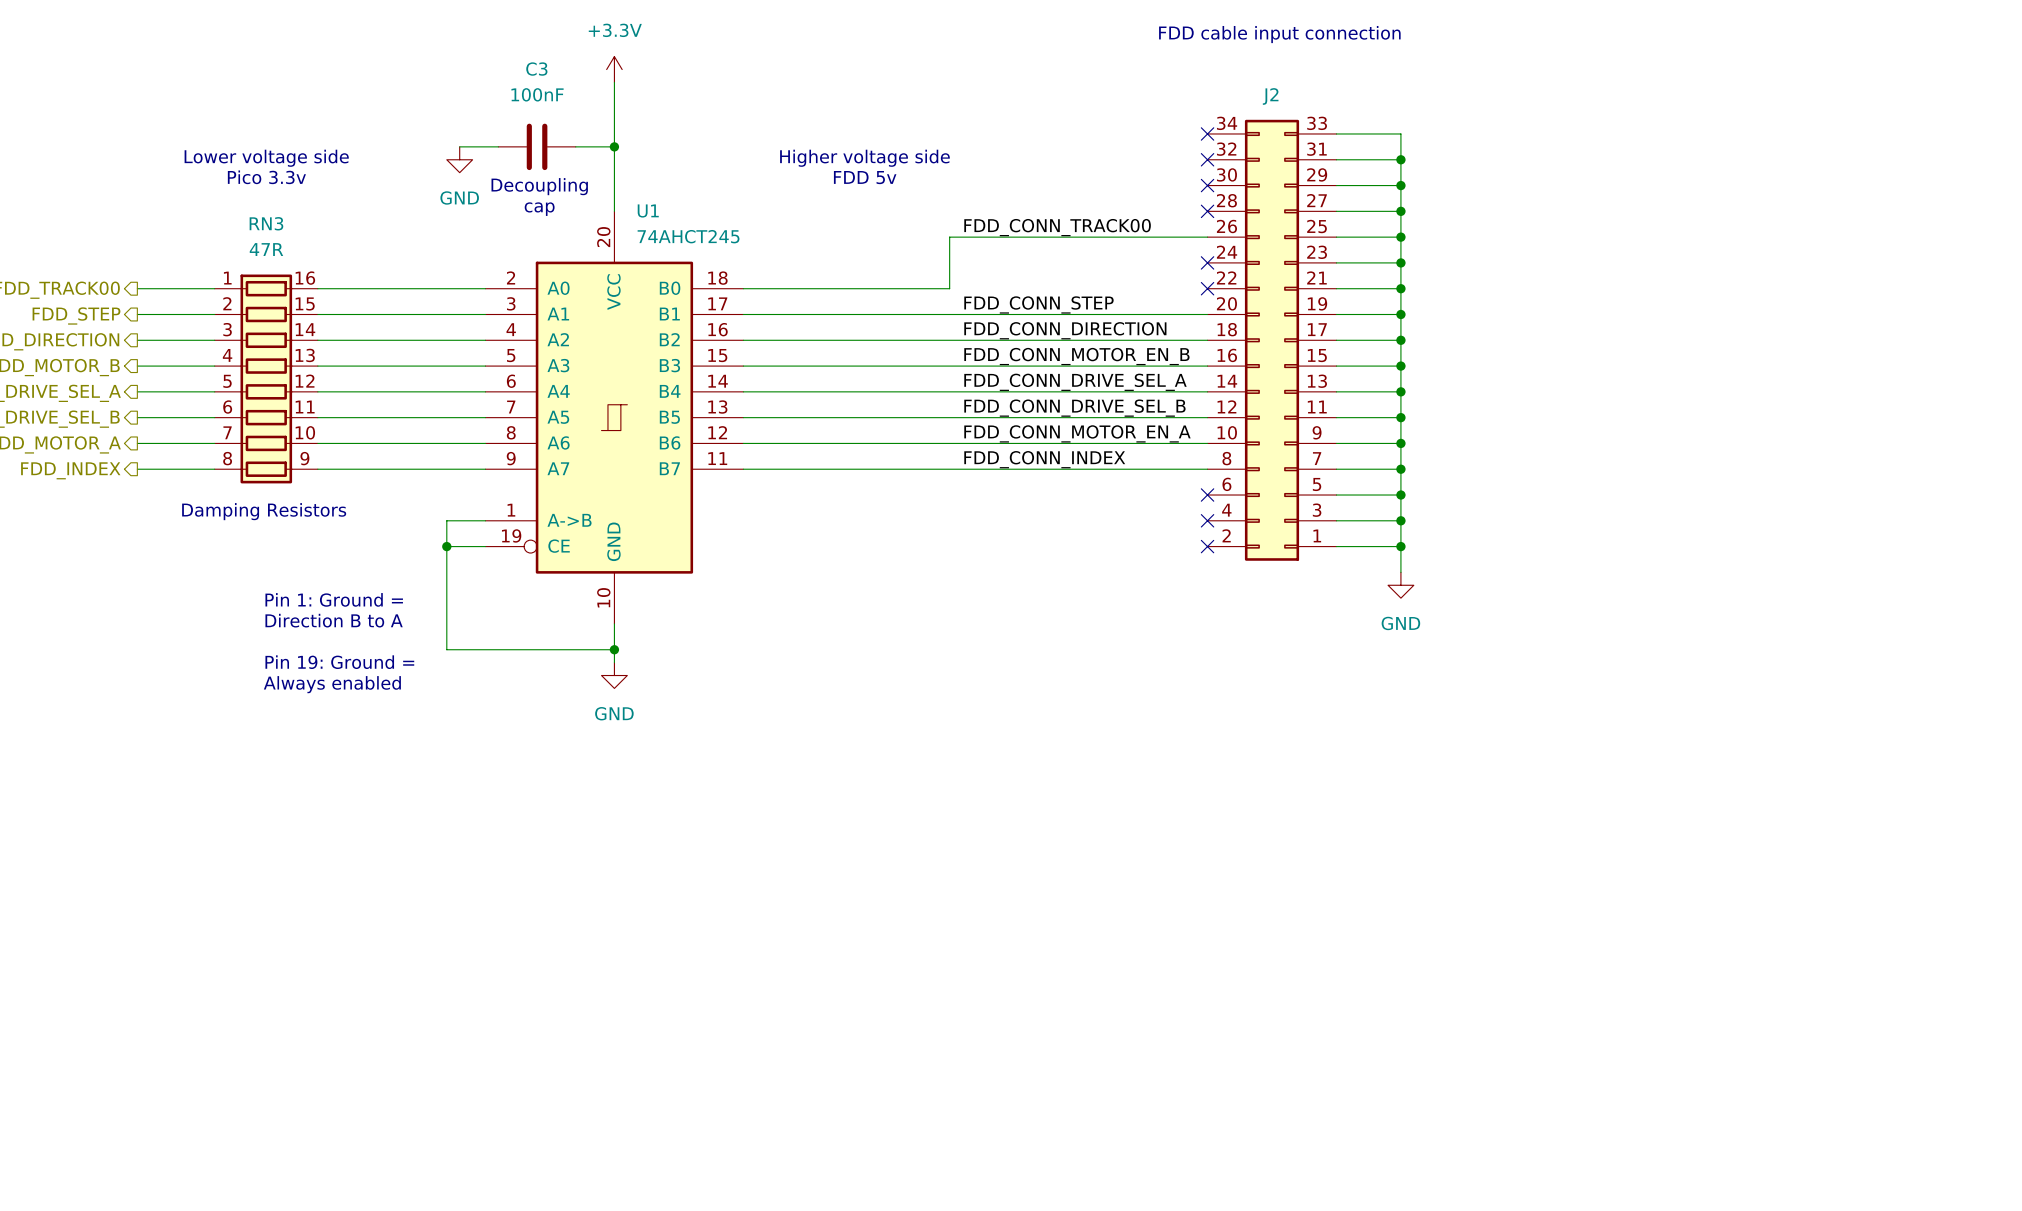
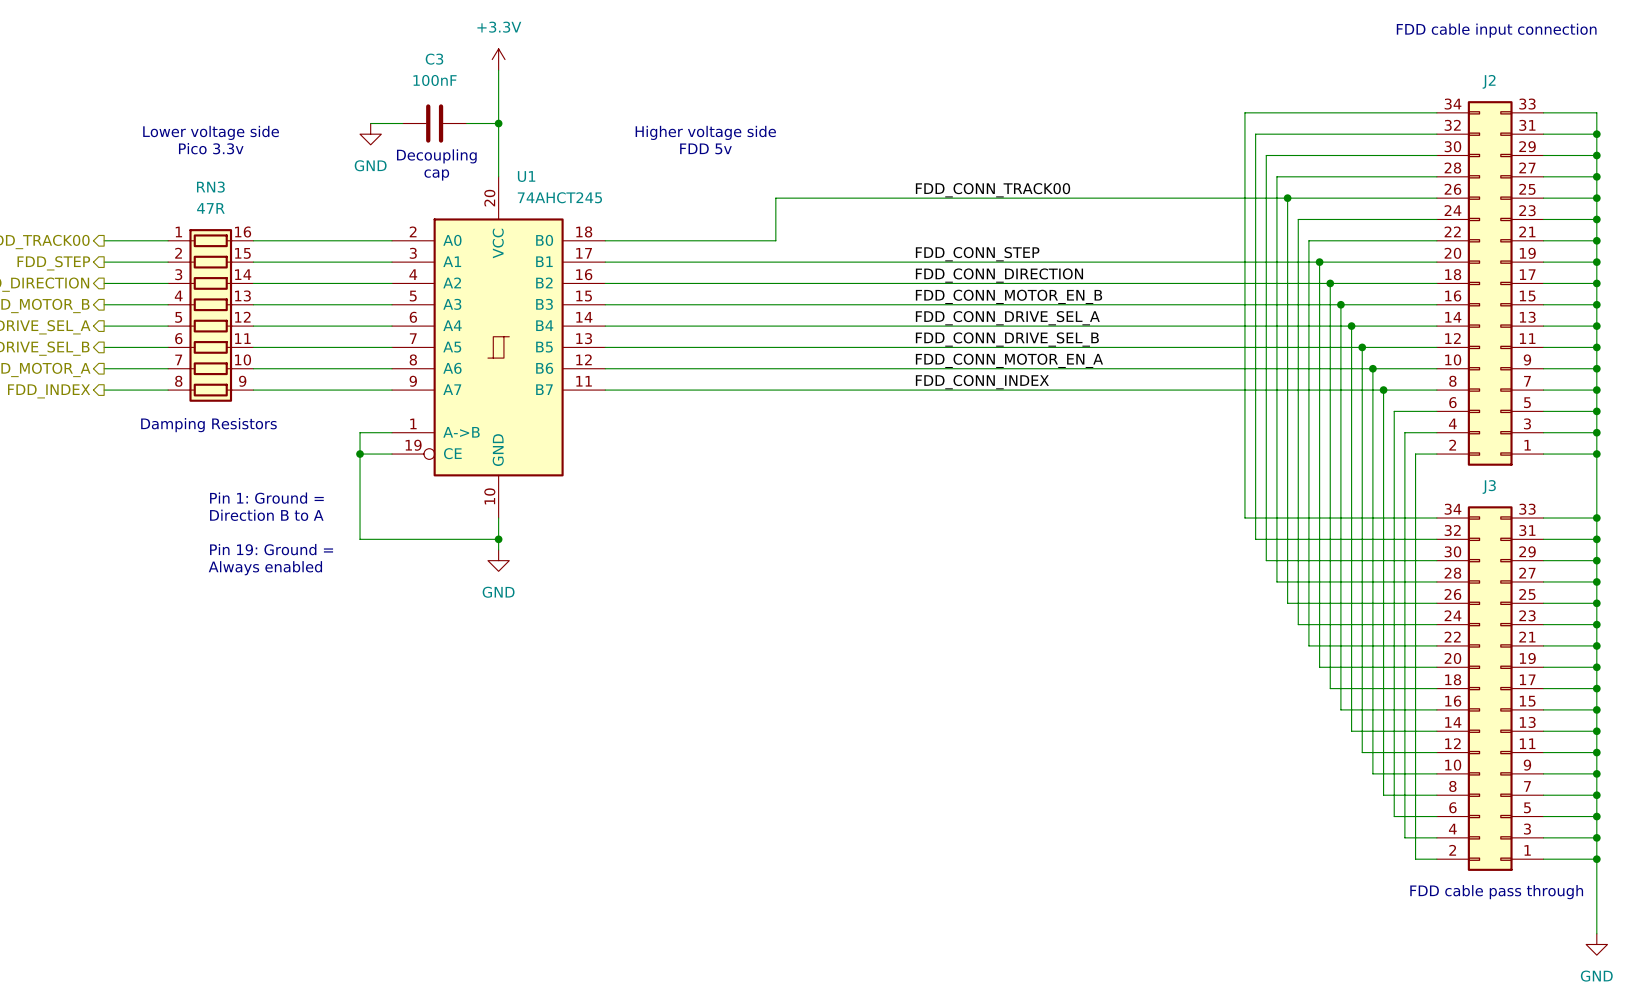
text: FDD cable input connection (1279, 34) -> none
text: none -> FDD cable input connection (1496, 30)
no-connect mark: (1207, 133) -> none
wire: (1336, 133) (1400, 133) (1400, 572) -> none
wire: none -> (1436, 112) (1244, 112) (1244, 518) (1436, 518)
wire: none -> (1543, 112) (1596, 112) (1596, 933)
no-connect mark: (1207, 159) -> none
wire: (1336, 159) (1400, 159) -> none
junction: (1400, 159) -> none
wire: none -> (1436, 134) (1255, 134) (1255, 539) (1436, 539)
wire: none -> (1543, 134) (1596, 134)
junction: none -> (1596, 134)
no-connect mark: (1207, 185) -> none
wire: (1336, 185) (1400, 185) -> none
junction: (1400, 185) -> none
wire: none -> (1436, 155) (1266, 155) (1266, 560) (1436, 560)
wire: none -> (1543, 155) (1596, 155)
junction: none -> (1596, 155)
no-connect mark: (1207, 211) -> none
wire: (1336, 211) (1400, 211) -> none
junction: (1400, 211) -> none
wire: none -> (1436, 176) (1276, 176) (1276, 581) (1436, 581)
wire: none -> (1543, 176) (1596, 176)
junction: none -> (1596, 176)
label position: FDD_CONN_TRACK00 (1057, 227) -> FDD_CONN_TRACK00 (993, 190)
wire: none -> (1149, 198) (1436, 198)
junction: (1400, 237) -> none
wire: none -> (1287, 198) (1287, 603) (1436, 603)
junction: none -> (1287, 198)
wire: none -> (1543, 198) (1596, 198)
junction: none -> (1596, 198)
no-connect mark: (1207, 262) -> none
wire: (1336, 262) (1400, 262) -> none
junction: (1400, 262) -> none
wire: none -> (1436, 219) (1298, 219) (1298, 624) (1436, 624)
wire: none -> (1543, 219) (1596, 219)
junction: none -> (1596, 219)
no-connect mark: (1207, 288) -> none
wire: (1336, 288) (1400, 288) -> none
junction: (1400, 288) -> none
wire: none -> (1436, 240) (1308, 240) (1308, 645) (1436, 645)
wire: none -> (1543, 240) (1596, 240)
junction: none -> (1596, 240)
label position: FDD_CONN_STEP (1038, 304) -> FDD_CONN_STEP (977, 254)
wire: none -> (1149, 262) (1436, 262)
junction: (1400, 314) -> none
wire: none -> (1319, 262) (1319, 667) (1436, 667)
junction: none -> (1319, 262)
wire: none -> (1543, 262) (1596, 262)
junction: none -> (1596, 262)
label position: FDD_CONN_DIRECTION (1065, 330) -> FDD_CONN_DIRECTION (999, 275)
J2 position: (1272, 340) -> (1490, 283)
wire: none -> (1149, 283) (1436, 283)
junction: (1400, 340) -> none
wire: none -> (1330, 283) (1330, 688) (1436, 688)
junction: none -> (1330, 283)
wire: none -> (1543, 283) (1596, 283)
junction: none -> (1596, 283)
label position: FDD_CONN_MOTOR_EN_B (1076, 356) -> FDD_CONN_MOTOR_EN_B (1009, 296)
wire: none -> (1149, 304) (1436, 304)
junction: (1400, 366) -> none
wire: none -> (1340, 304) (1340, 709) (1436, 709)
junction: none -> (1340, 304)
wire: none -> (1543, 304) (1596, 304)
junction: none -> (1596, 304)
label position: FDD_CONN_DRIVE_SEL_A (1075, 382) -> FDD_CONN_DRIVE_SEL_A (1007, 318)
wire: none -> (1149, 326) (1436, 326)
junction: (1400, 391) -> none
wire: none -> (1351, 326) (1351, 731) (1436, 731)
junction: none -> (1351, 326)
wire: none -> (1543, 326) (1596, 326)
junction: none -> (1596, 326)
label position: FDD_CONN_DRIVE_SEL_B (1074, 408) -> FDD_CONN_DRIVE_SEL_B (1007, 339)
wire: none -> (1149, 347) (1436, 347)
junction: (1400, 417) -> none
wire: none -> (1362, 347) (1362, 752) (1436, 752)
junction: none -> (1362, 347)
wire: none -> (1543, 347) (1596, 347)
junction: none -> (1596, 347)
label position: FDD_CONN_MOTOR_EN_A (1077, 433) -> FDD_CONN_MOTOR_EN_A (1009, 360)
wire: none -> (1149, 368) (1436, 368)
junction: (1400, 443) -> none
wire: none -> (1372, 368) (1372, 773) (1436, 773)
junction: none -> (1372, 368)
wire: none -> (1543, 368) (1596, 368)
junction: none -> (1596, 368)
label position: FDD_CONN_INDEX (1044, 459) -> FDD_CONN_INDEX (982, 382)
wire: none -> (1149, 390) (1436, 390)
junction: (1400, 469) -> none
wire: none -> (1383, 390) (1383, 795) (1436, 795)
junction: none -> (1383, 390)
wire: none -> (1543, 390) (1596, 390)
junction: none -> (1596, 390)
no-connect mark: (1207, 495) -> none
wire: (1336, 495) (1400, 495) -> none
junction: (1400, 495) -> none
wire: none -> (1436, 411) (1394, 411) (1394, 816) (1436, 816)
wire: none -> (1543, 411) (1596, 411)
junction: none -> (1596, 411)
no-connect mark: (1207, 520) -> none
wire: (1336, 520) (1400, 520) -> none
junction: (1400, 520) -> none
wire: none -> (1436, 432) (1404, 432) (1404, 837) (1436, 837)
wire: none -> (1543, 432) (1596, 432)
junction: none -> (1596, 432)
no-connect mark: (1207, 546) -> none
wire: (1336, 546) (1400, 546) -> none
junction: (1400, 546) -> none
wire: none -> (1436, 454) (1415, 454) (1415, 859) (1436, 859)
wire: none -> (1543, 454) (1596, 454)
junction: none -> (1596, 454)
power symbol: GND (1400, 585) -> none
wire: none -> (1543, 518) (1596, 518)
junction: none -> (1596, 518)
wire: none -> (1543, 539) (1596, 539)
junction: none -> (1596, 539)
wire: none -> (1543, 560) (1596, 560)
junction: none -> (1596, 560)
wire: none -> (1543, 581) (1596, 581)
junction: none -> (1596, 581)
wire: none -> (1543, 603) (1596, 603)
junction: none -> (1596, 603)
wire: none -> (1543, 624) (1596, 624)
junction: none -> (1596, 624)
wire: none -> (1543, 645) (1596, 645)
junction: none -> (1596, 645)
wire: none -> (1543, 667) (1596, 667)
junction: none -> (1596, 667)
J3: none -> (1490, 688)
wire: none -> (1543, 688) (1596, 688)
junction: none -> (1596, 688)
wire: none -> (1543, 709) (1596, 709)
junction: none -> (1596, 709)
wire: none -> (1543, 731) (1596, 731)
junction: none -> (1596, 731)
wire: none -> (1543, 752) (1596, 752)
junction: none -> (1596, 752)
wire: none -> (1543, 773) (1596, 773)
junction: none -> (1596, 773)
wire: none -> (1543, 795) (1596, 795)
junction: none -> (1596, 795)
wire: none -> (1543, 816) (1596, 816)
junction: none -> (1596, 816)
wire: none -> (1543, 837) (1596, 837)
junction: none -> (1596, 837)
wire: none -> (1543, 859) (1596, 859)
junction: none -> (1596, 859)
text: none -> FDD cable pass through (1496, 892)
power symbol: none -> GND (1596, 944)

